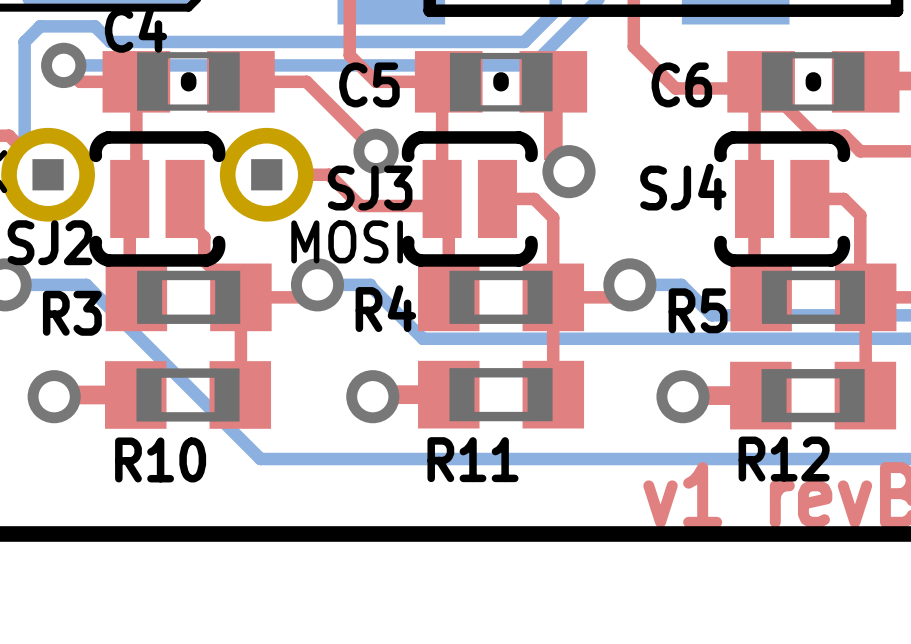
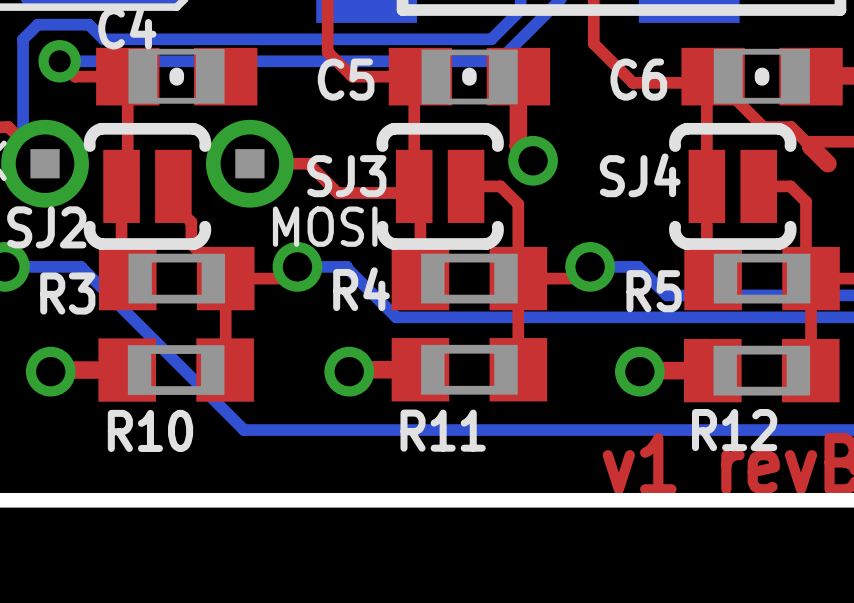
top track: (240, 81) (306, 81) (376, 151) -> none
via: (376, 151) -> none
top track: none -> (810, 146) (827, 163)

